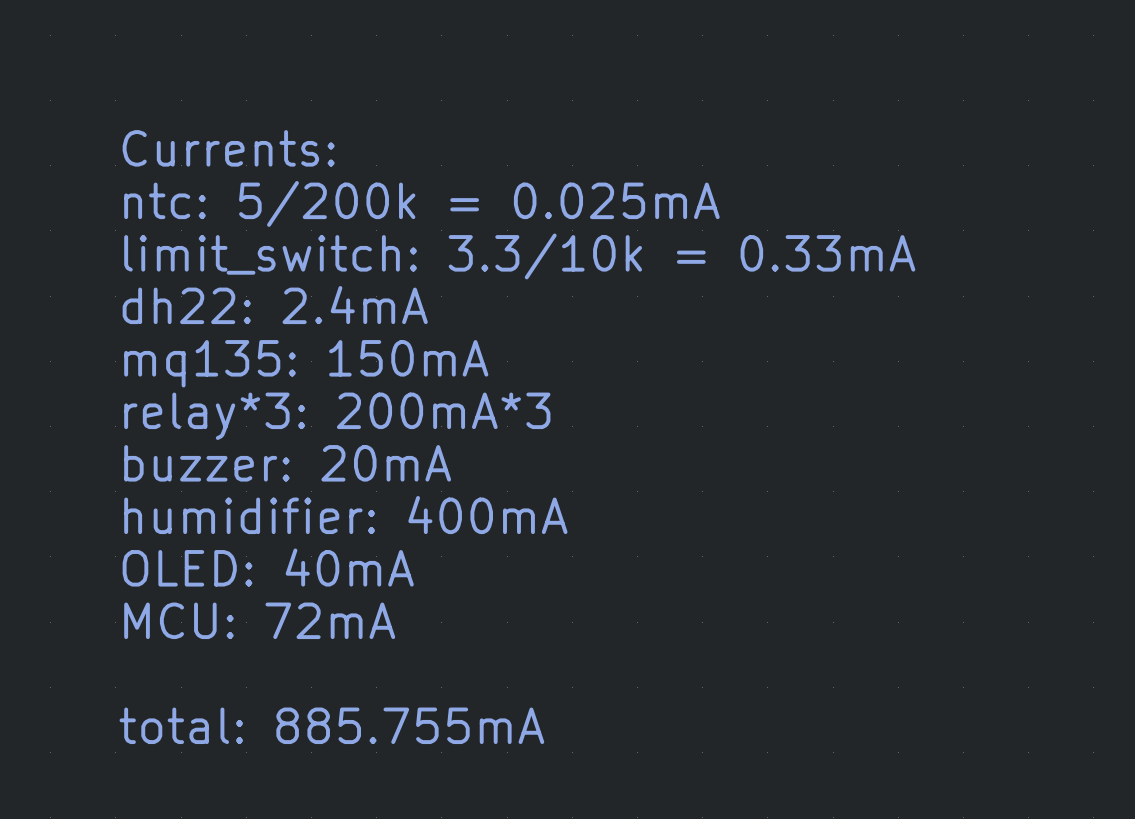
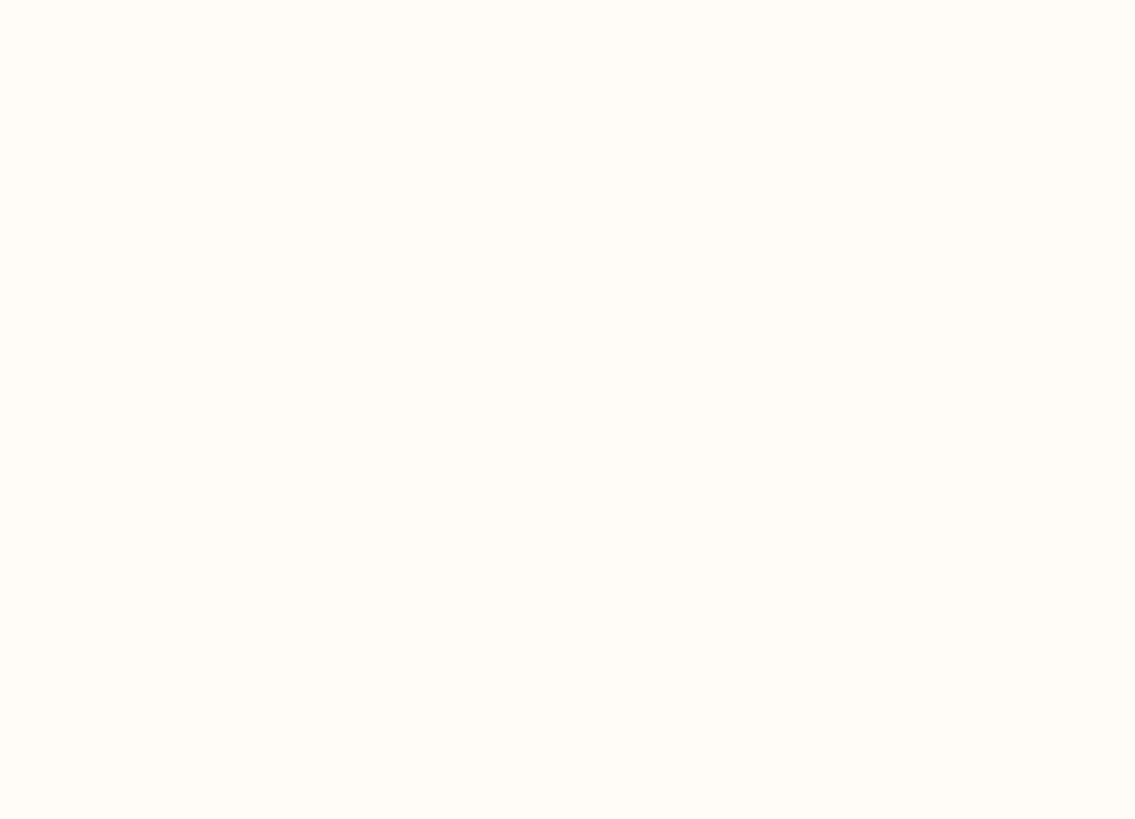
text: Currents: (228, 148) -> none
text: ntc: 5/200k = 0.025mA (421, 203) -> none
text: limit_switch: 3.3/10k = 0.33mA (519, 256) -> none
text: dh22: 2.4mA (275, 305) -> none
text: mq135: 150mA (306, 363) -> none
text: relay*3: 200mA*3 (337, 416) -> none
text: buzzer: 20mA (287, 463) -> none
text: humidifier: 400mA (345, 515) -> none
text: OLED: 40mA (268, 567) -> none
text: MCU: 72mA (259, 620) -> none
text: total: 885.755mA (331, 725) -> none

